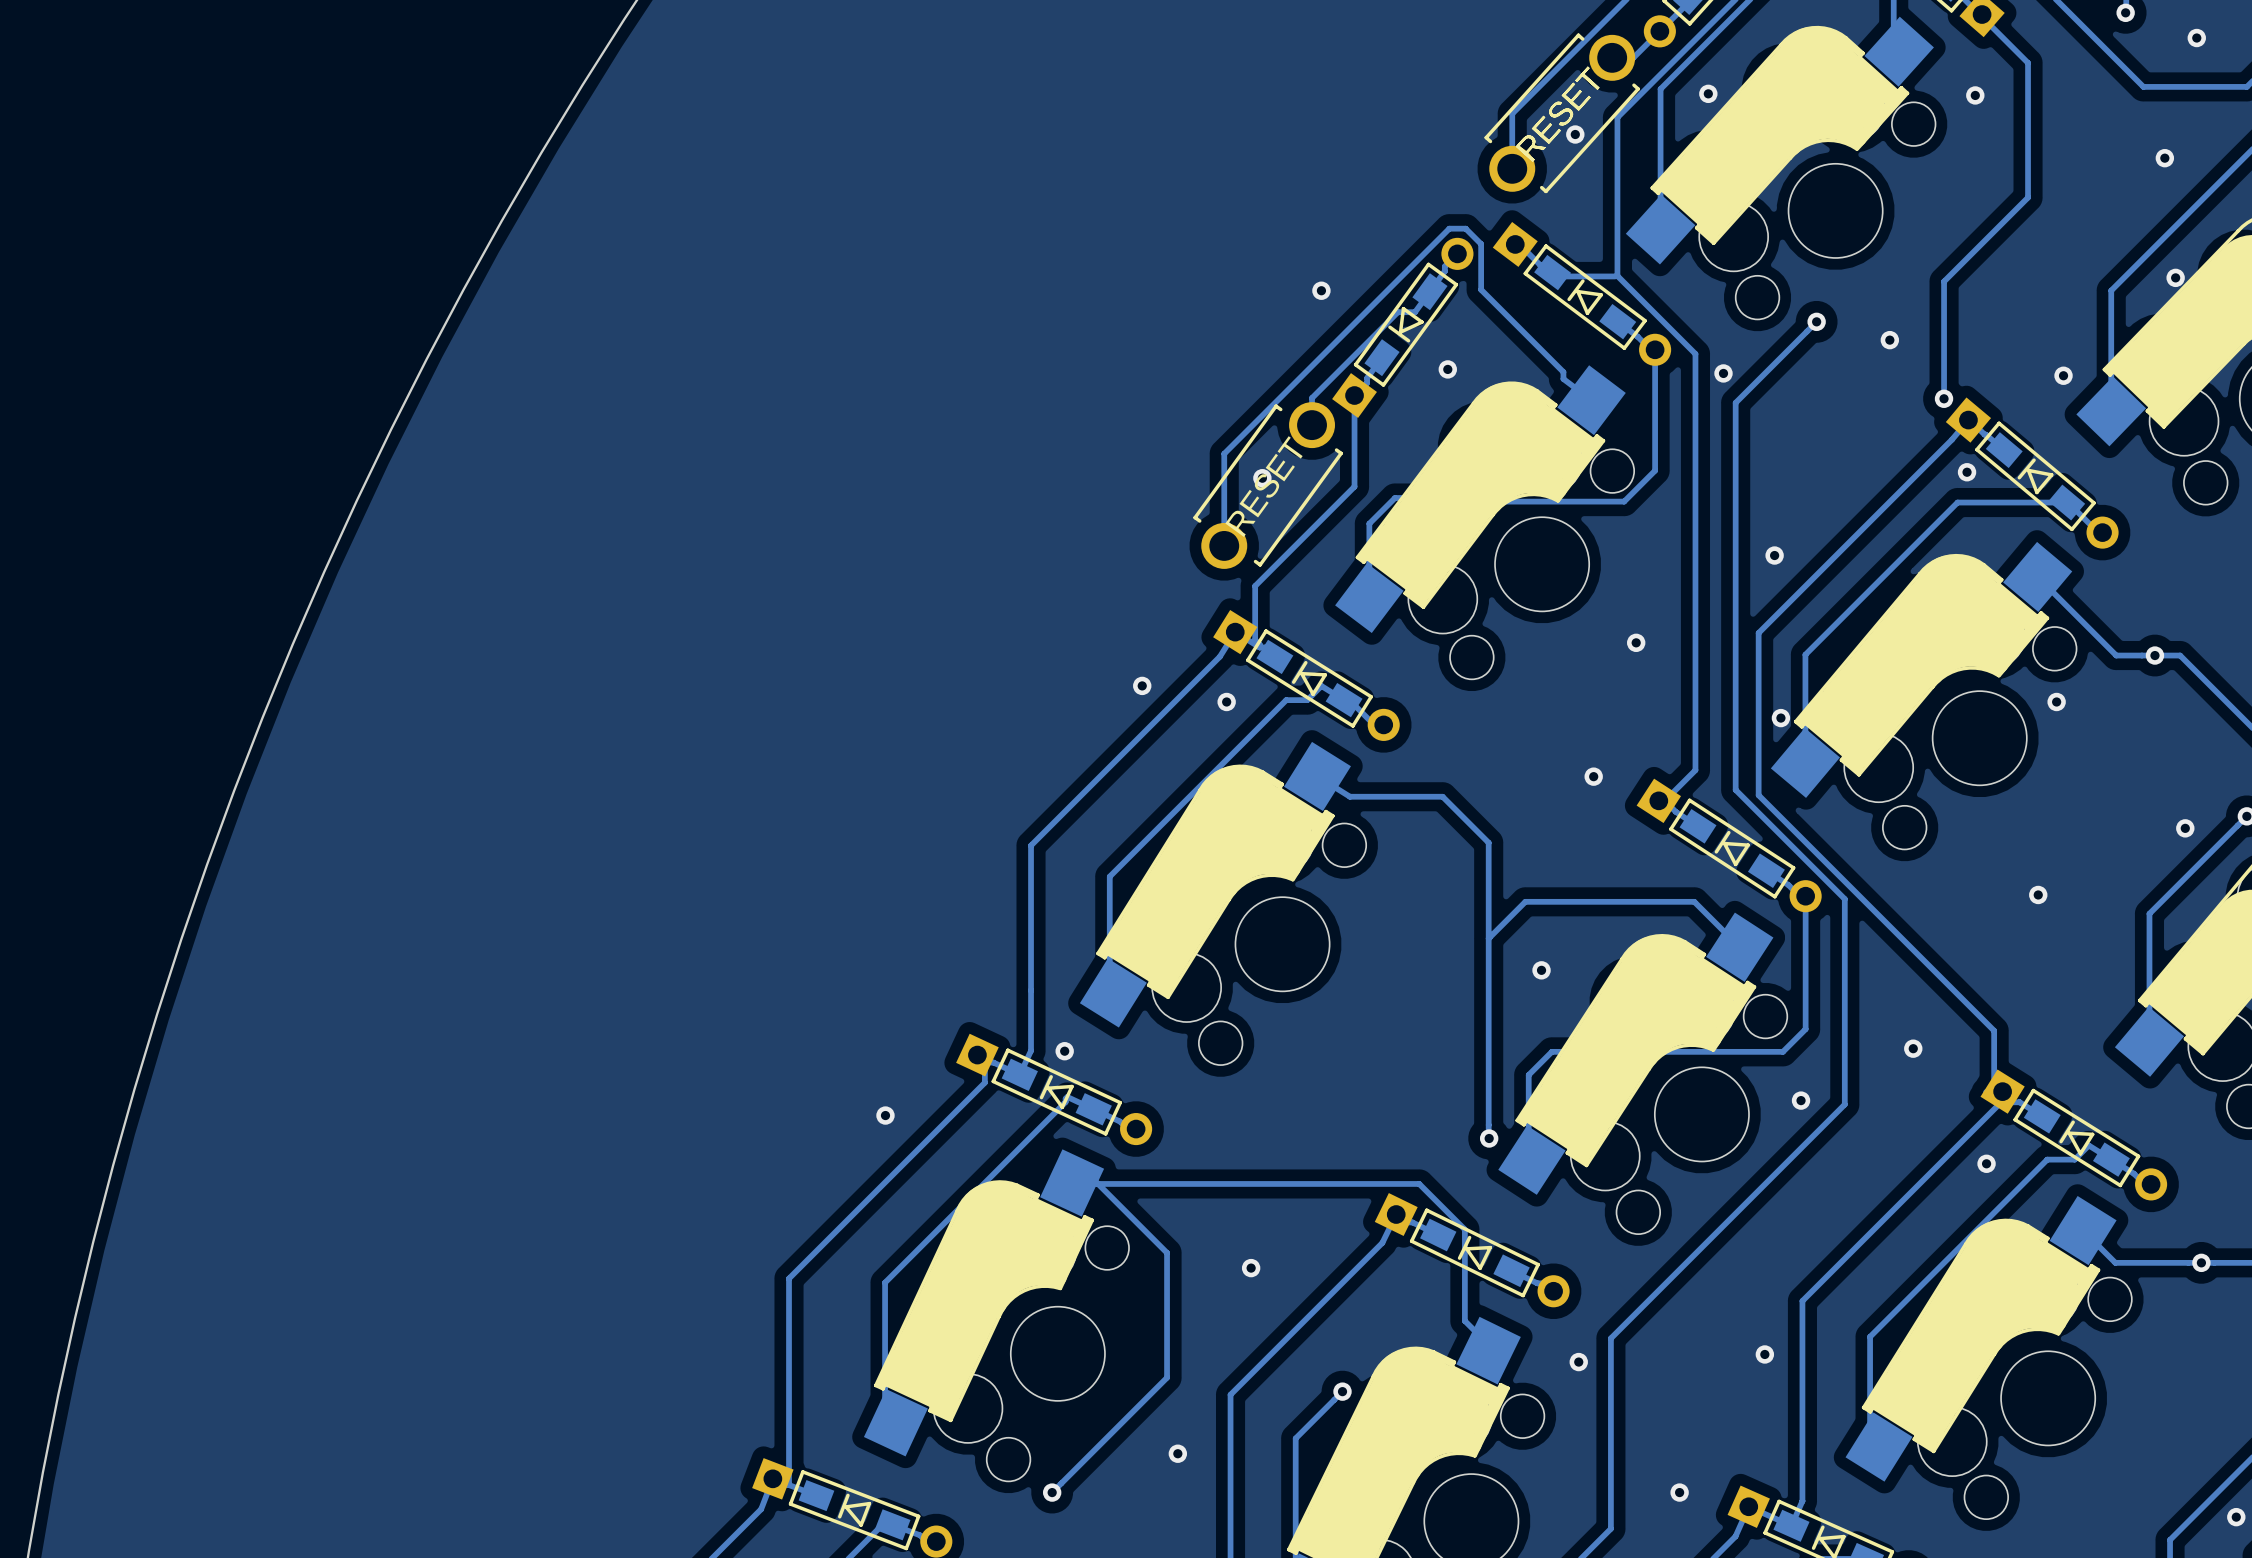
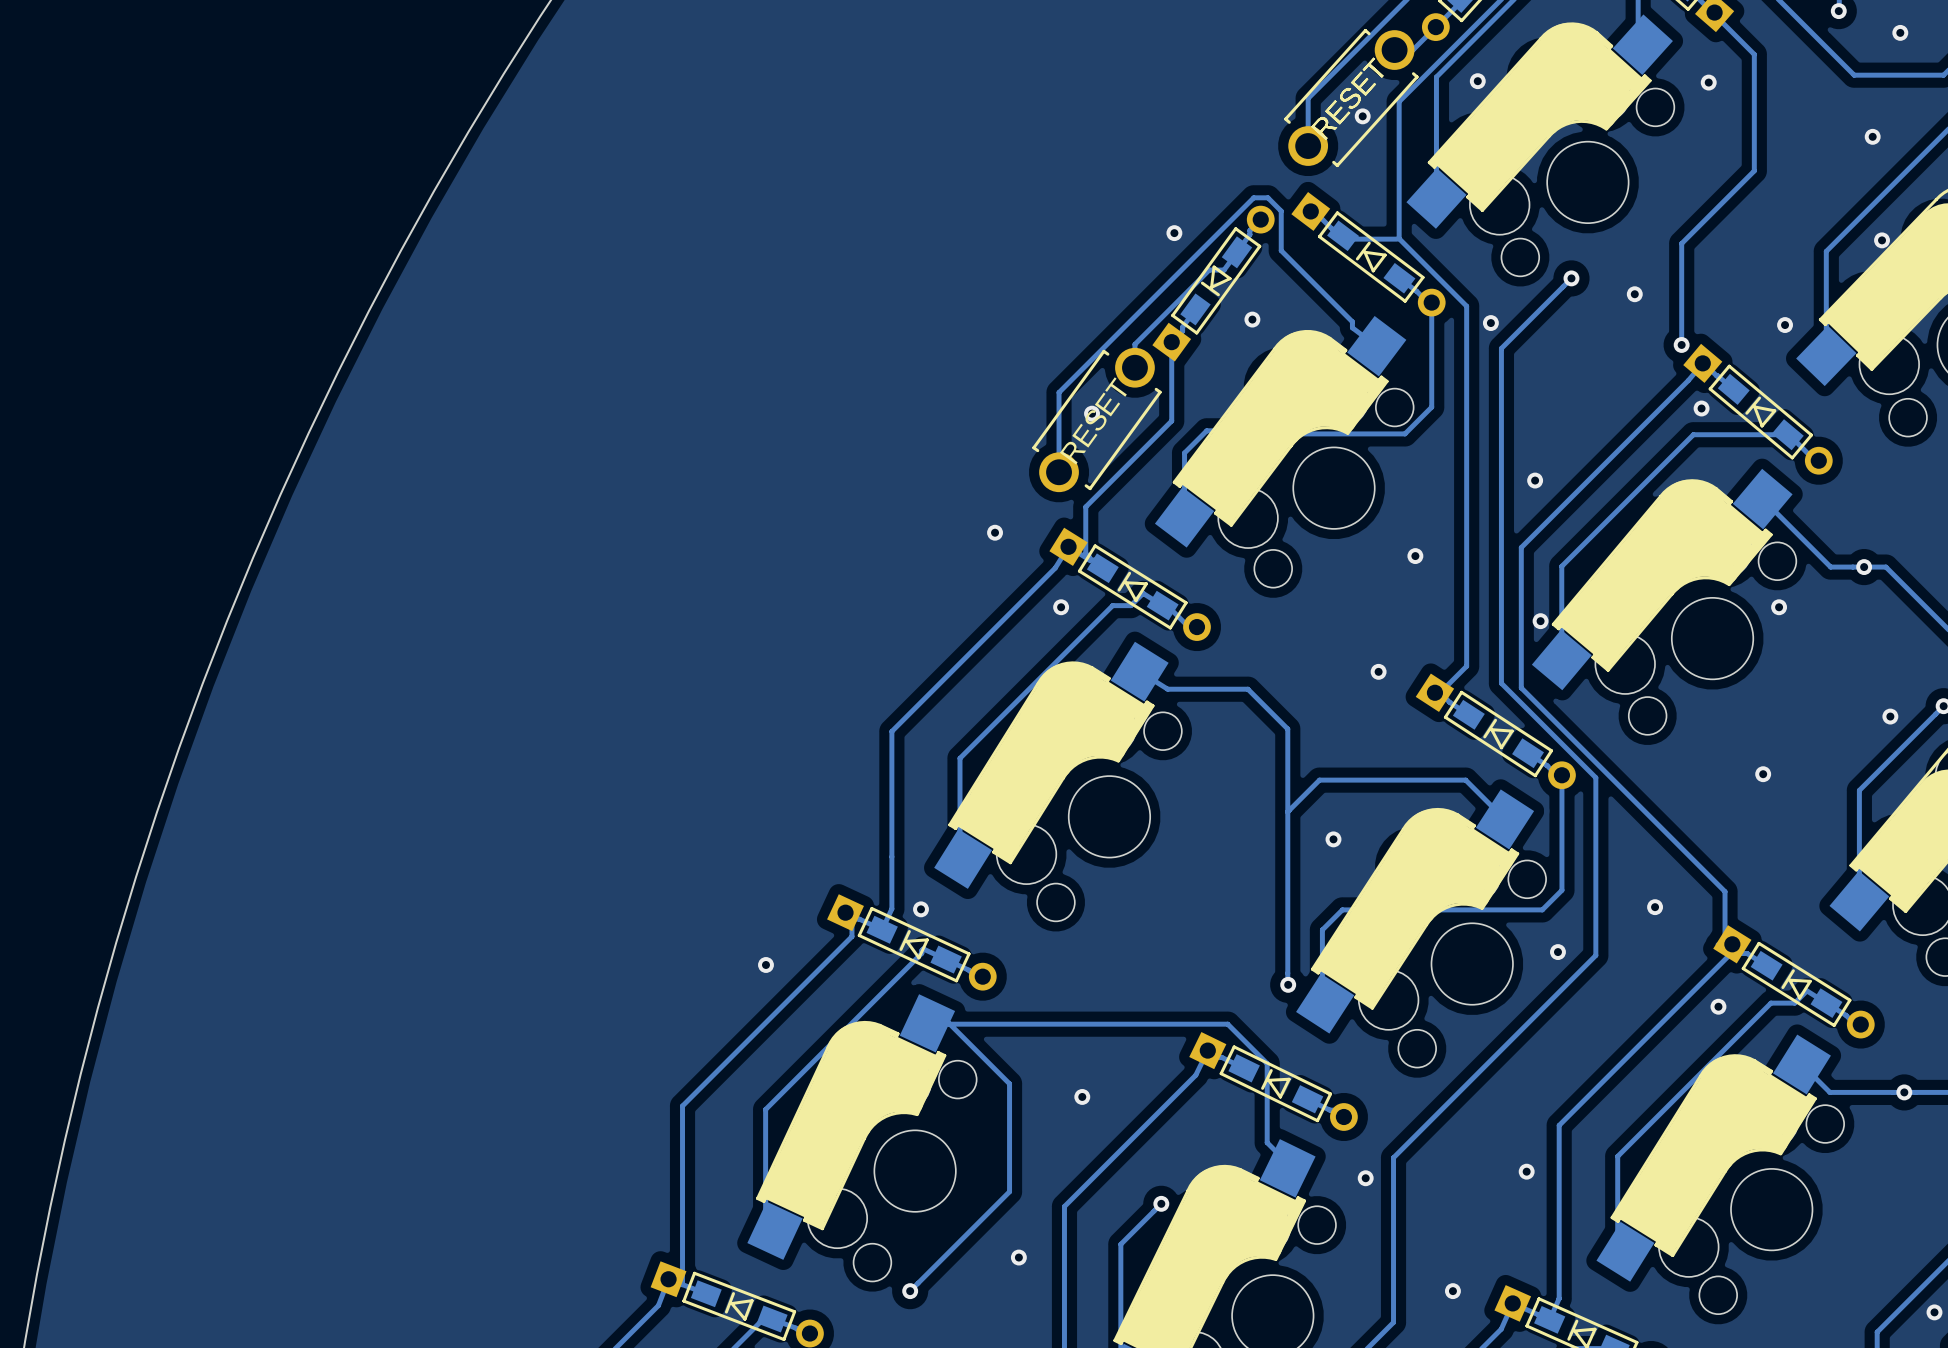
via position: (1321, 290) -> (1174, 233)
via position: (1142, 685) -> (995, 532)

